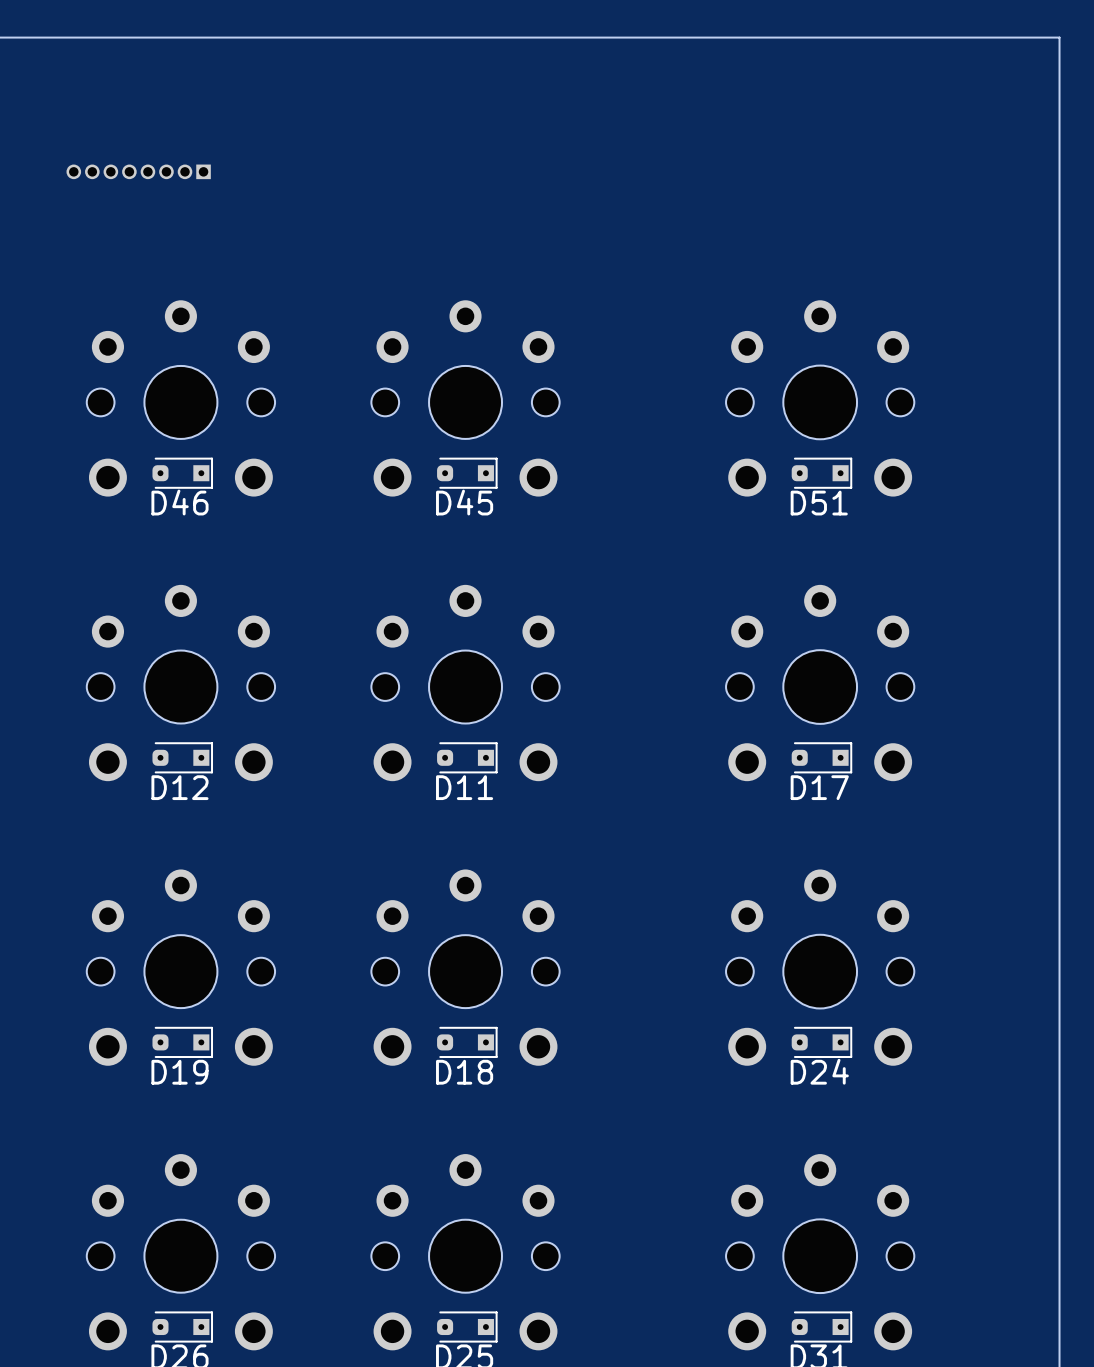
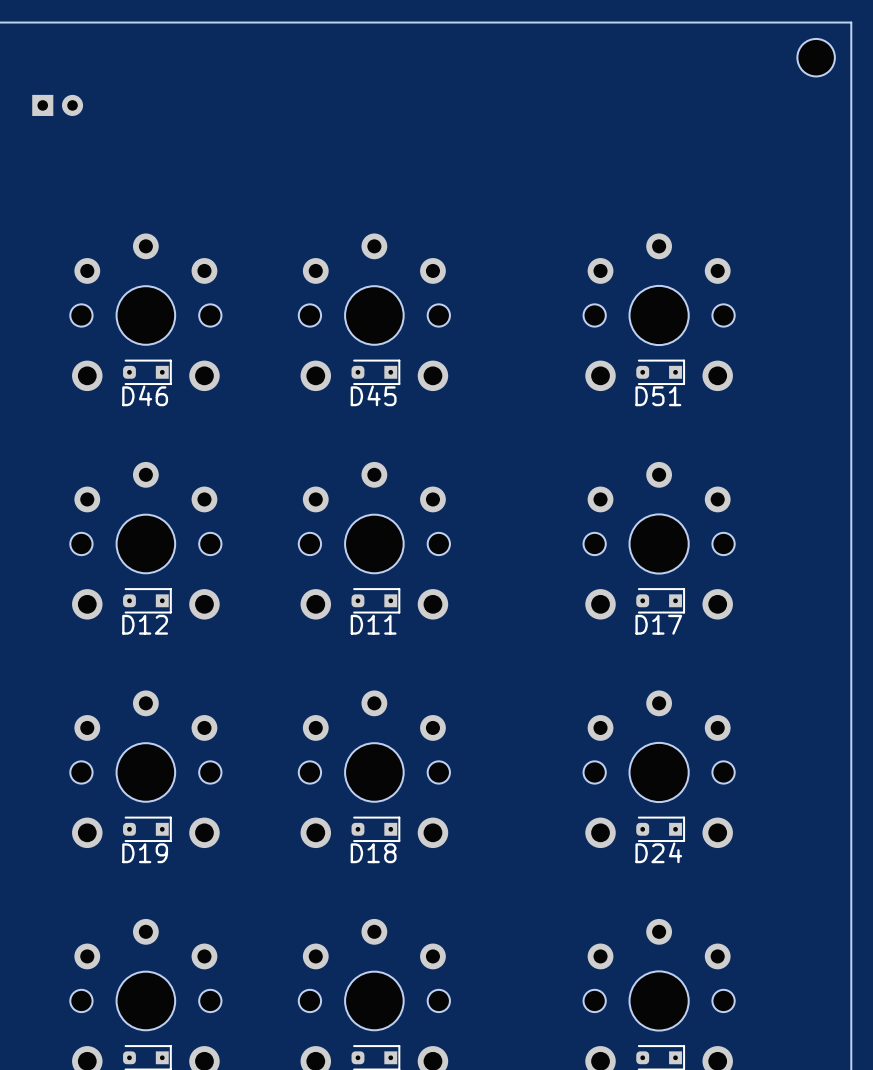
part: none -> (816, 57)
part: none -> (57, 105)
part: (138, 171) -> none

